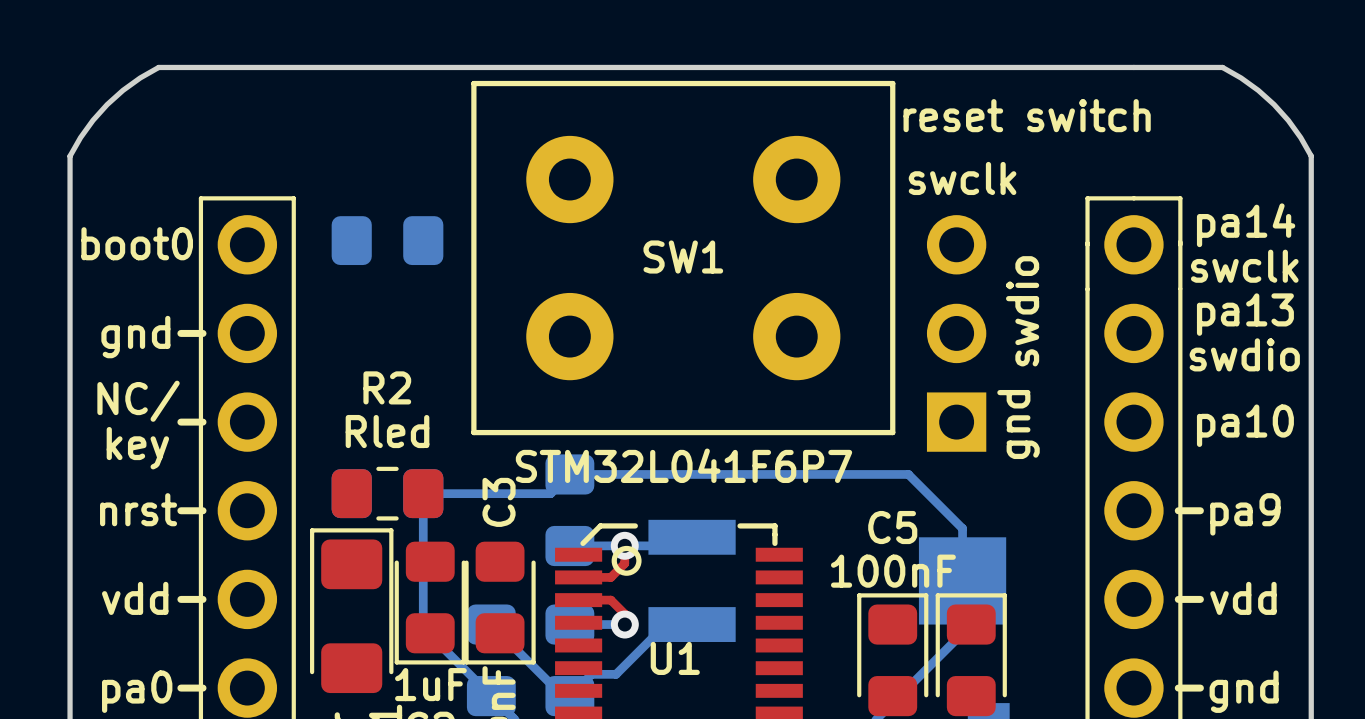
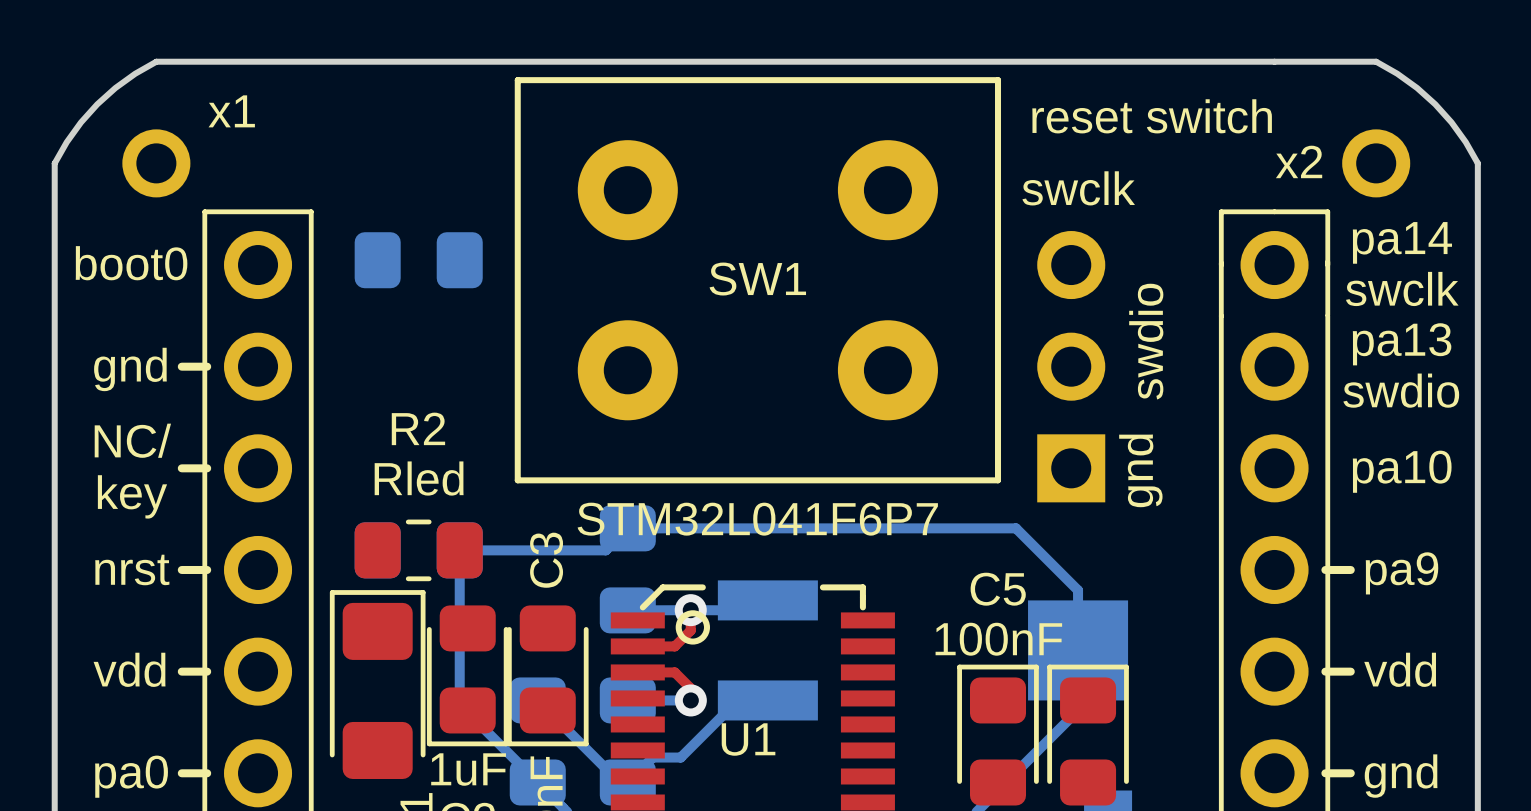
text: none -> x1 (231, 111)
text: none -> x2 (1299, 161)
part: none -> (156, 163)
part: none -> (1376, 163)

